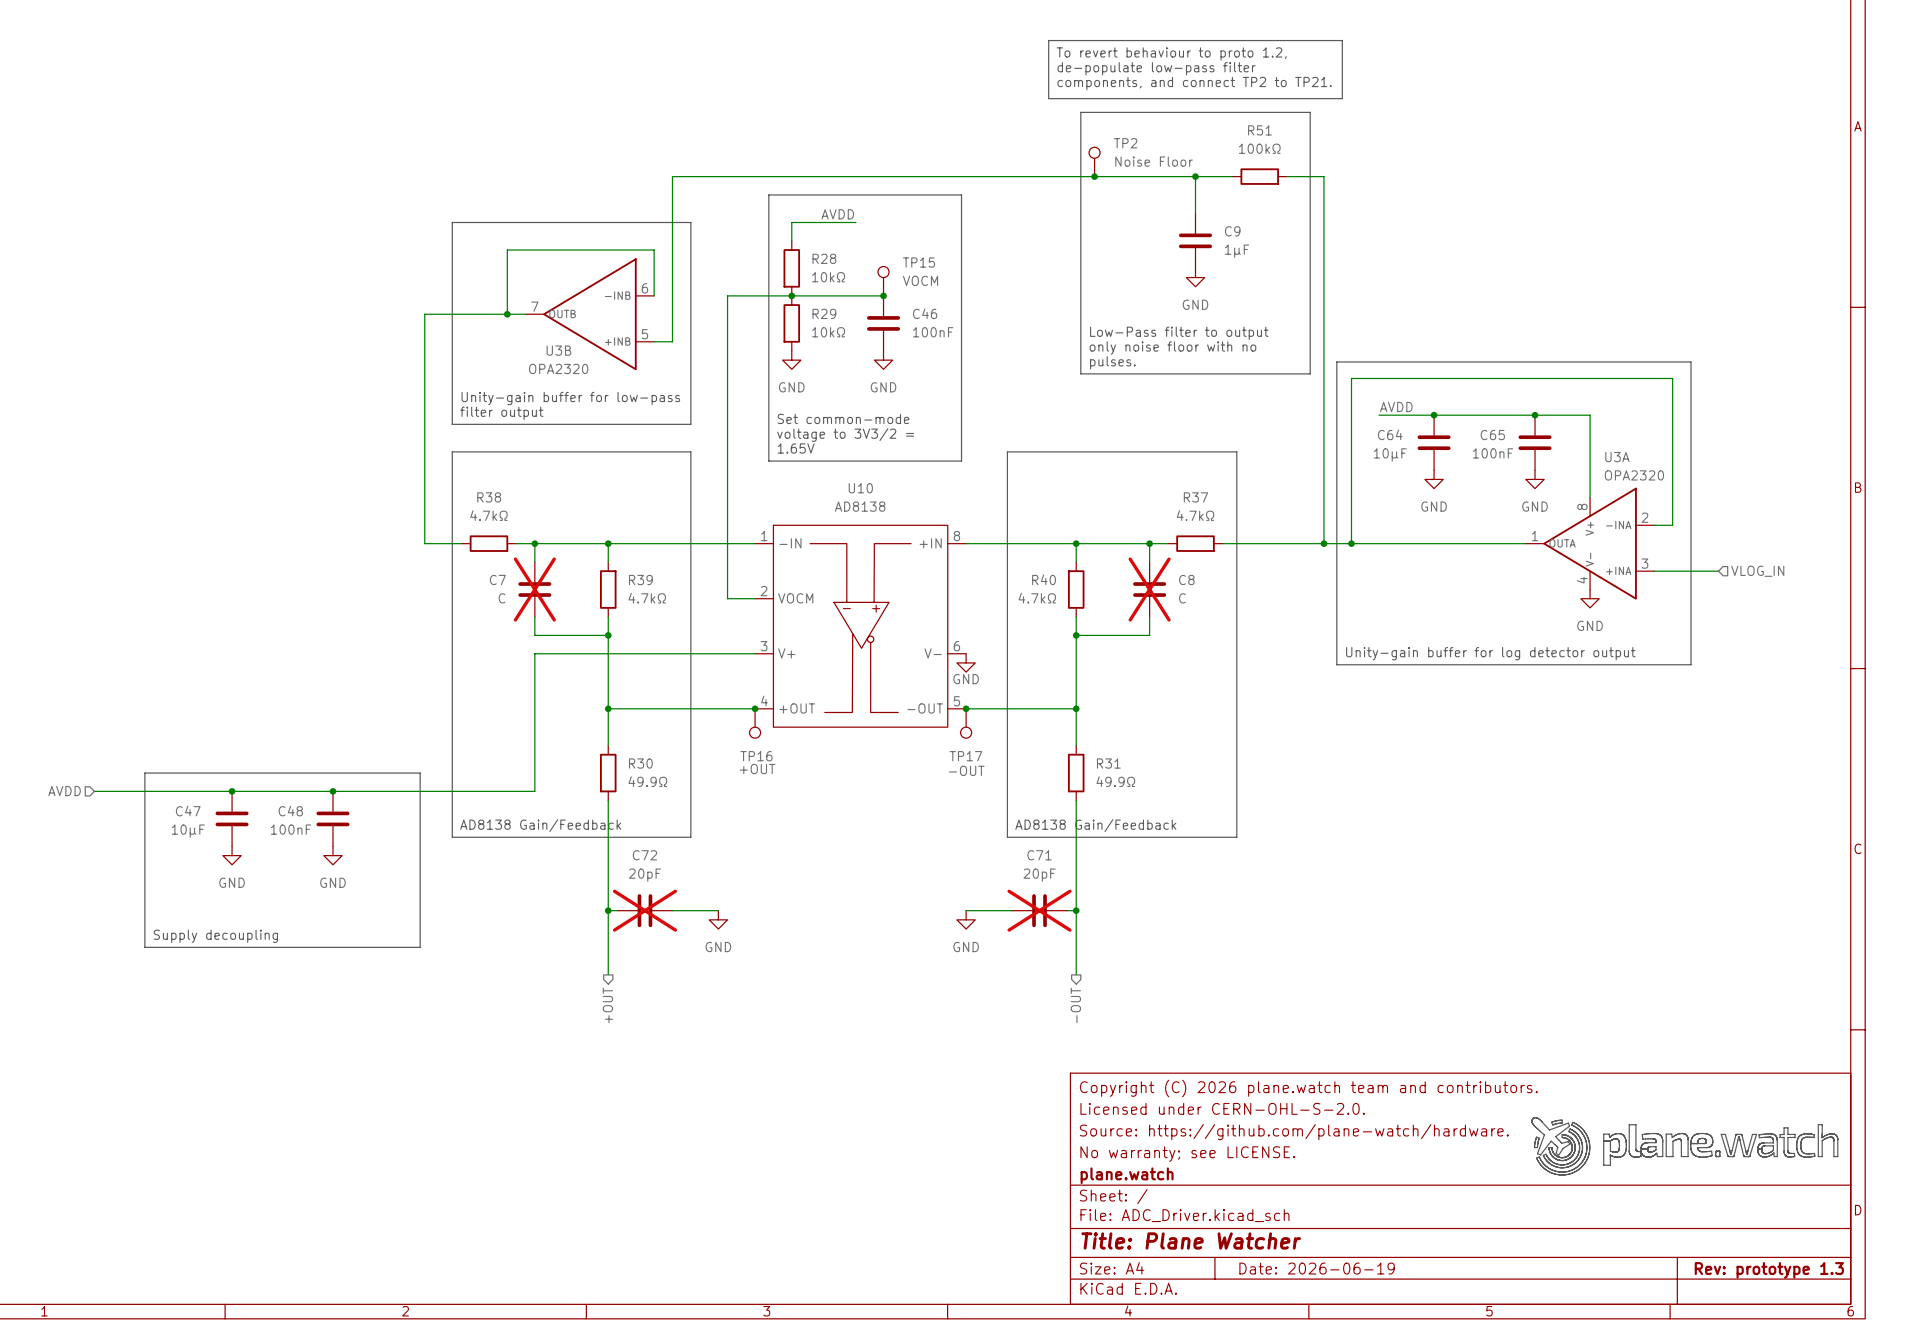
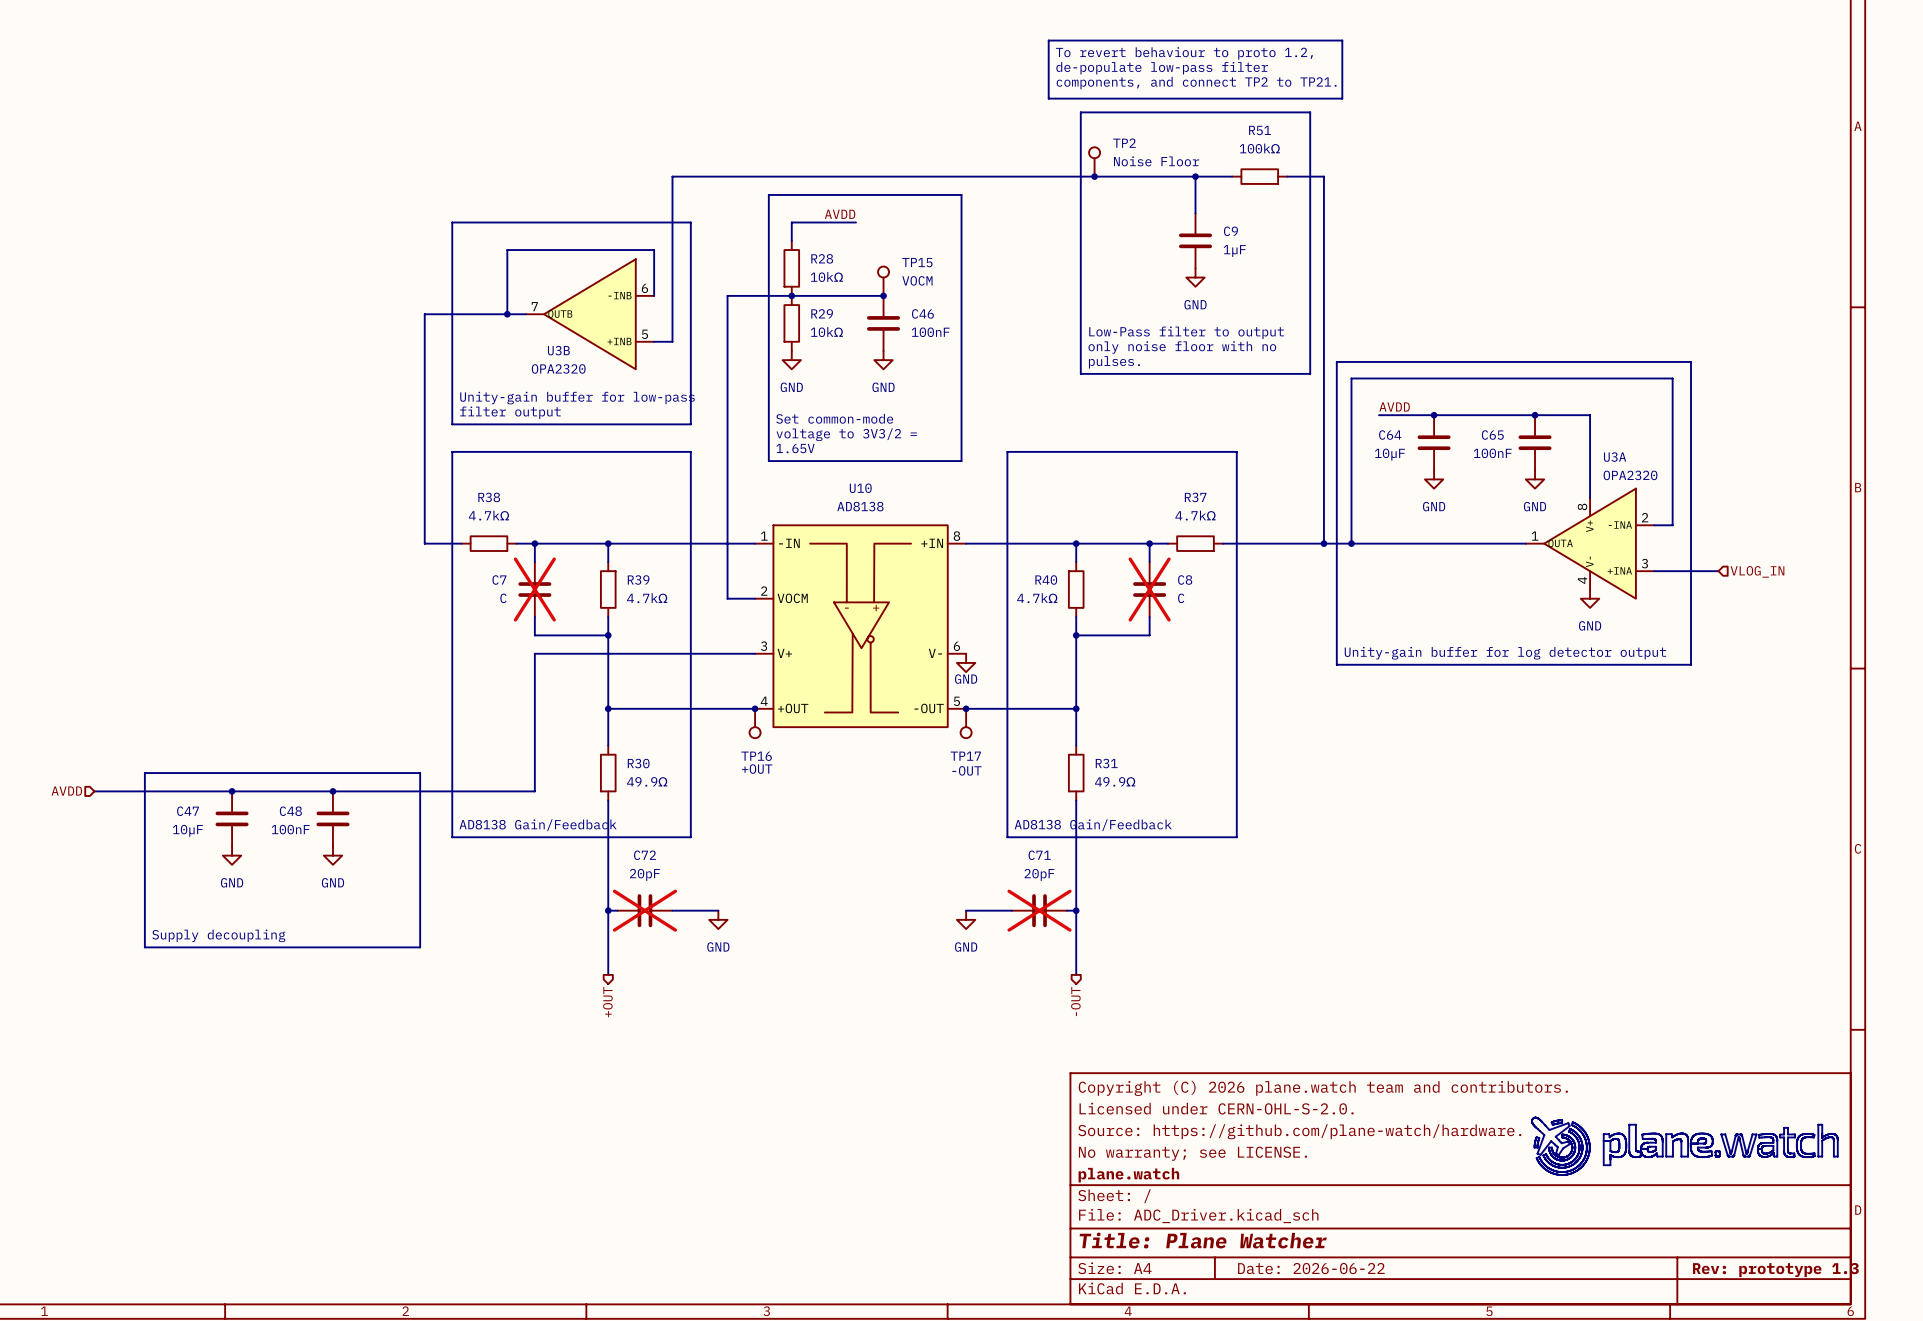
title block: Date: 2026-06-19 (1317, 1268) -> Date: 2026-06-22 (1311, 1268)

